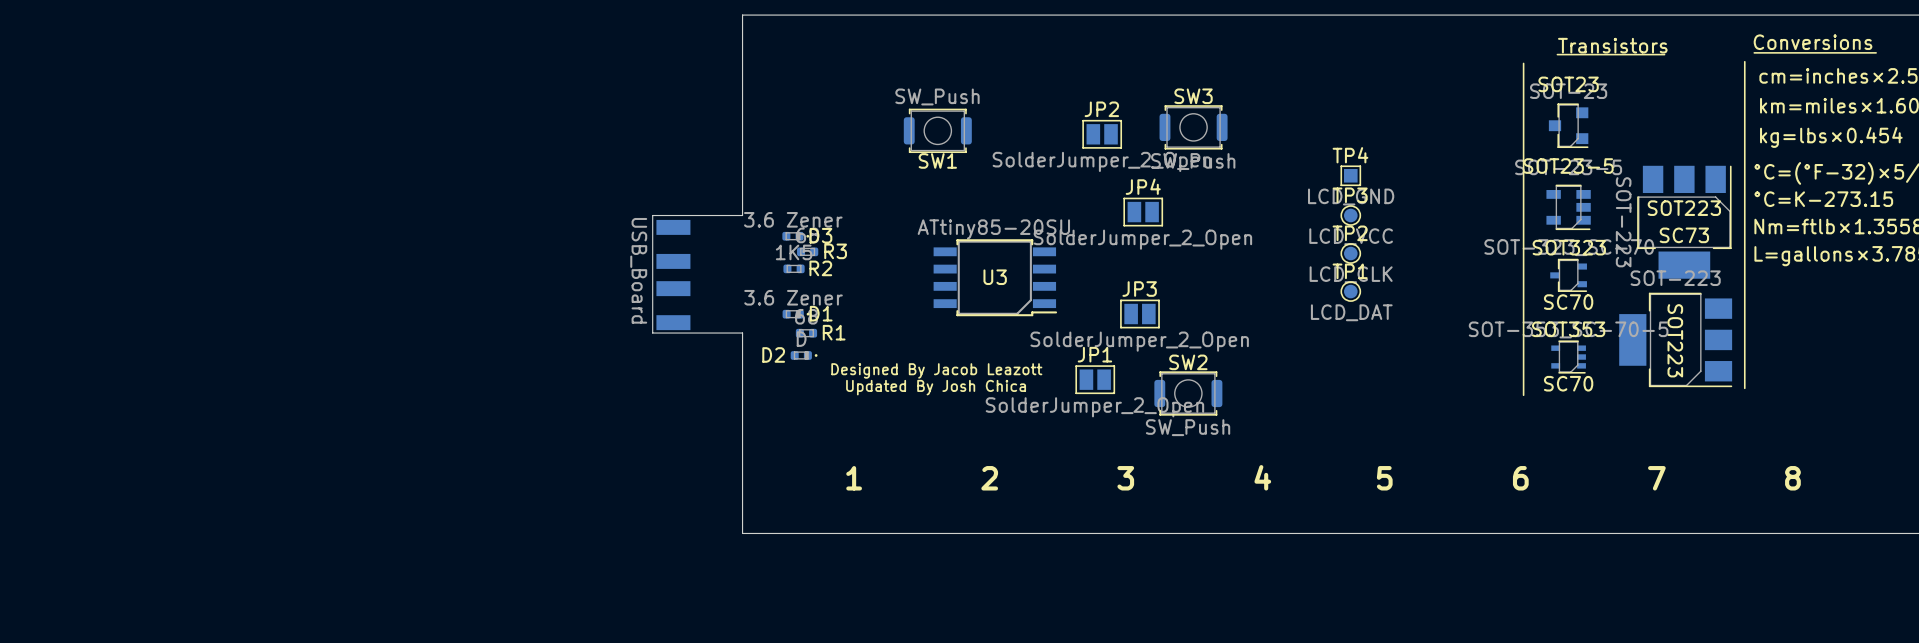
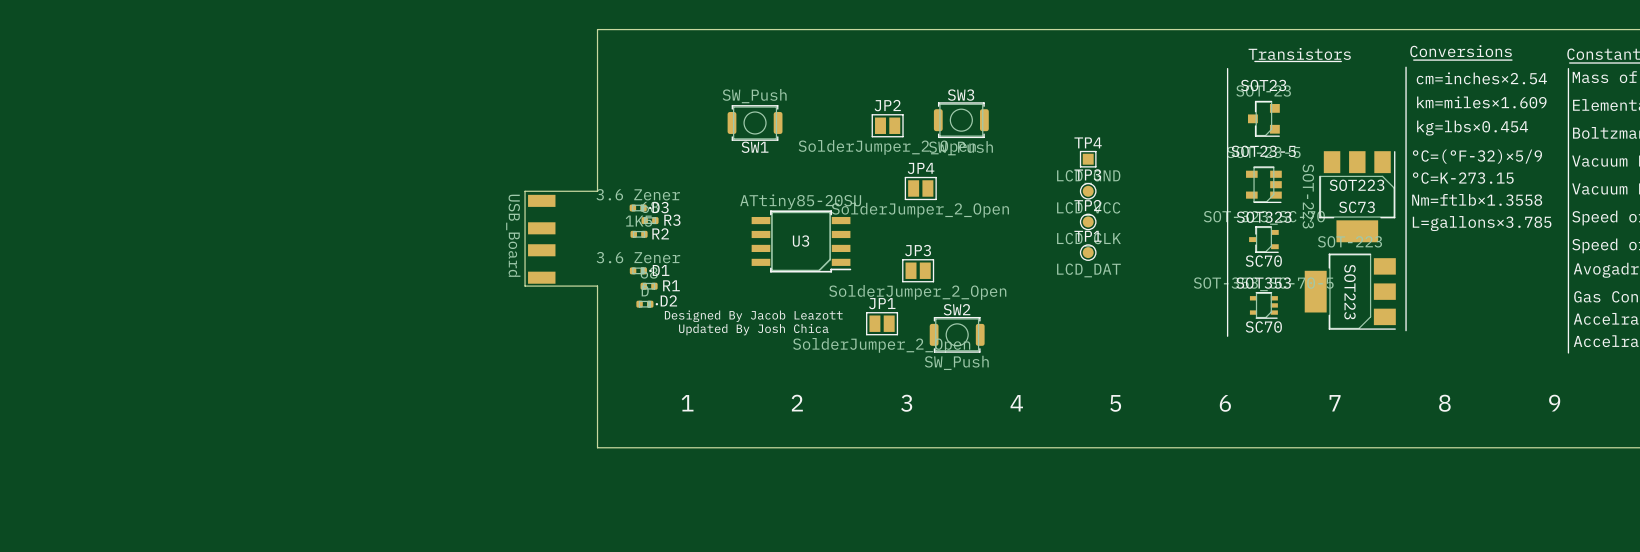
D2 name position: D2 (773, 354) -> D2 (668, 300)

